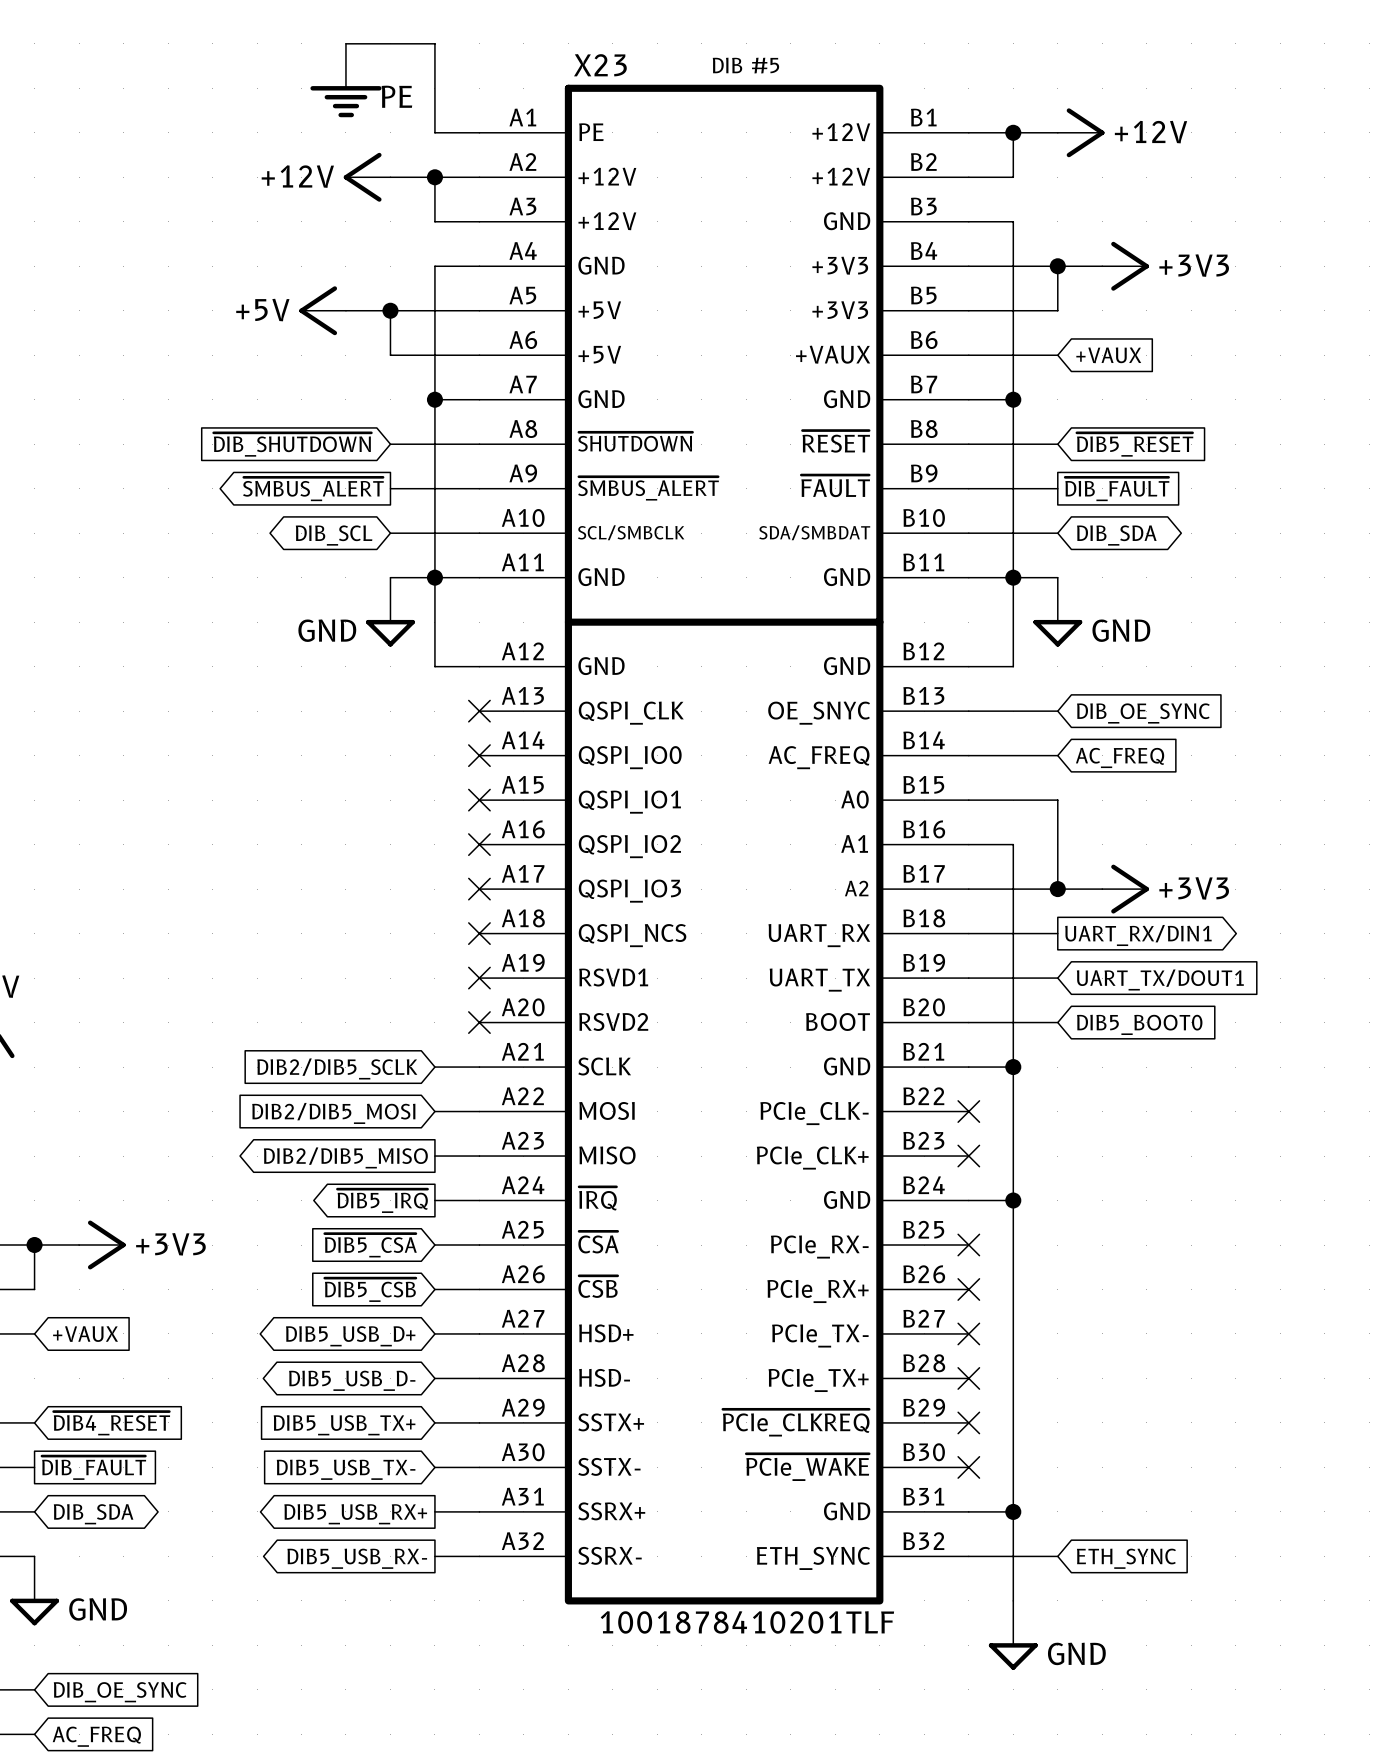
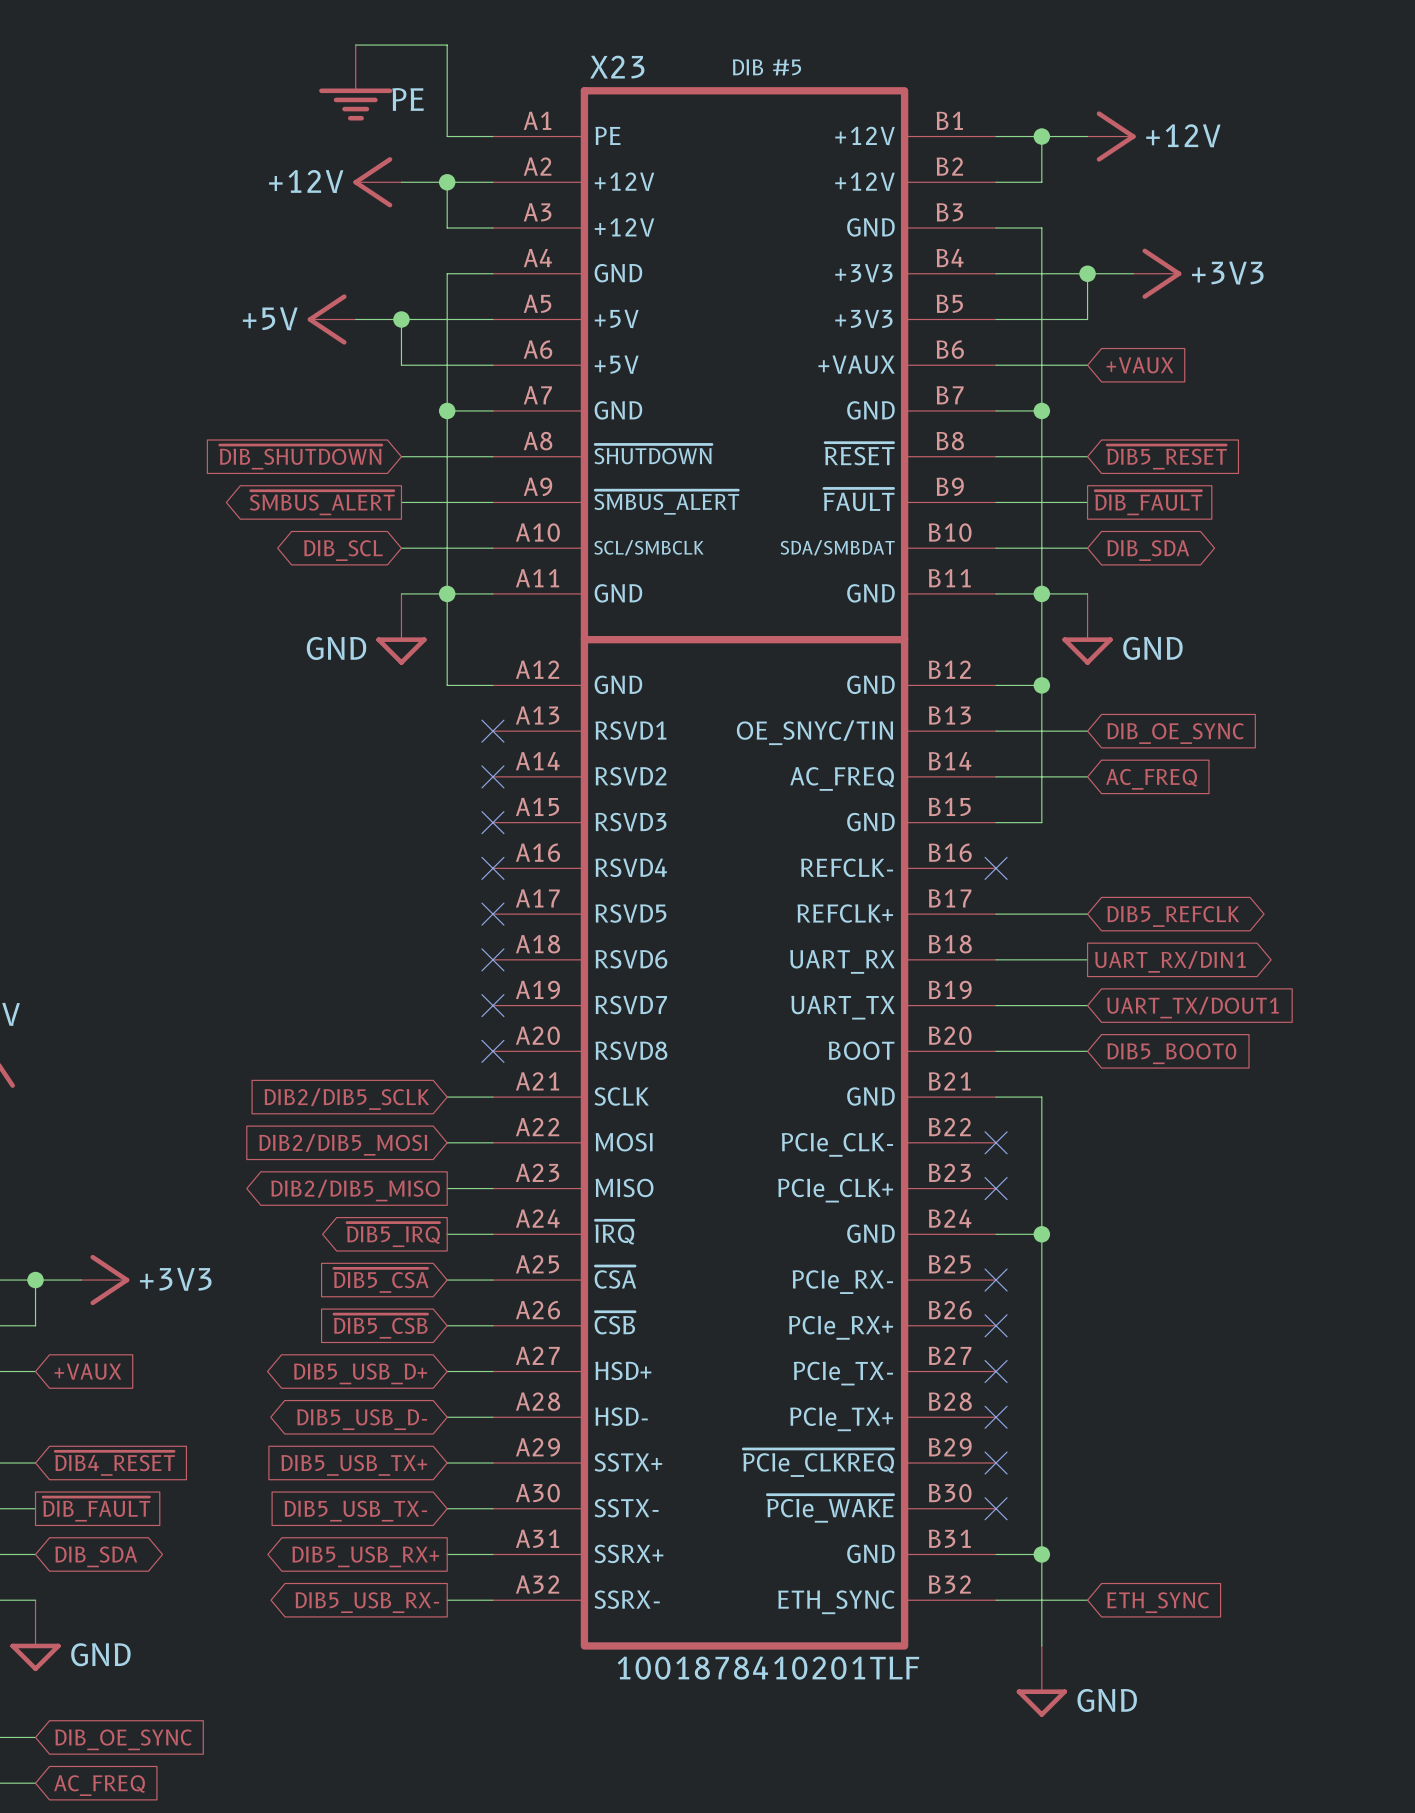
X23 symbol: [479, 84, 969, 1605] -> [492, 87, 997, 1650]
junction: none -> (1041, 685)
wire: (1013, 800) (1057, 800) (1057, 889) (1102, 889) -> (1041, 822) (1041, 685)
wire: (968, 844) (1013, 844) (1013, 1067) -> none
no-connect mark: none -> (996, 868)
junction: (1057, 889) -> none
power symbol: +3V3 (1125, 889) -> none
global label: none -> DIB5_REFCLK (1173, 916)
junction: (1013, 1067) -> none

